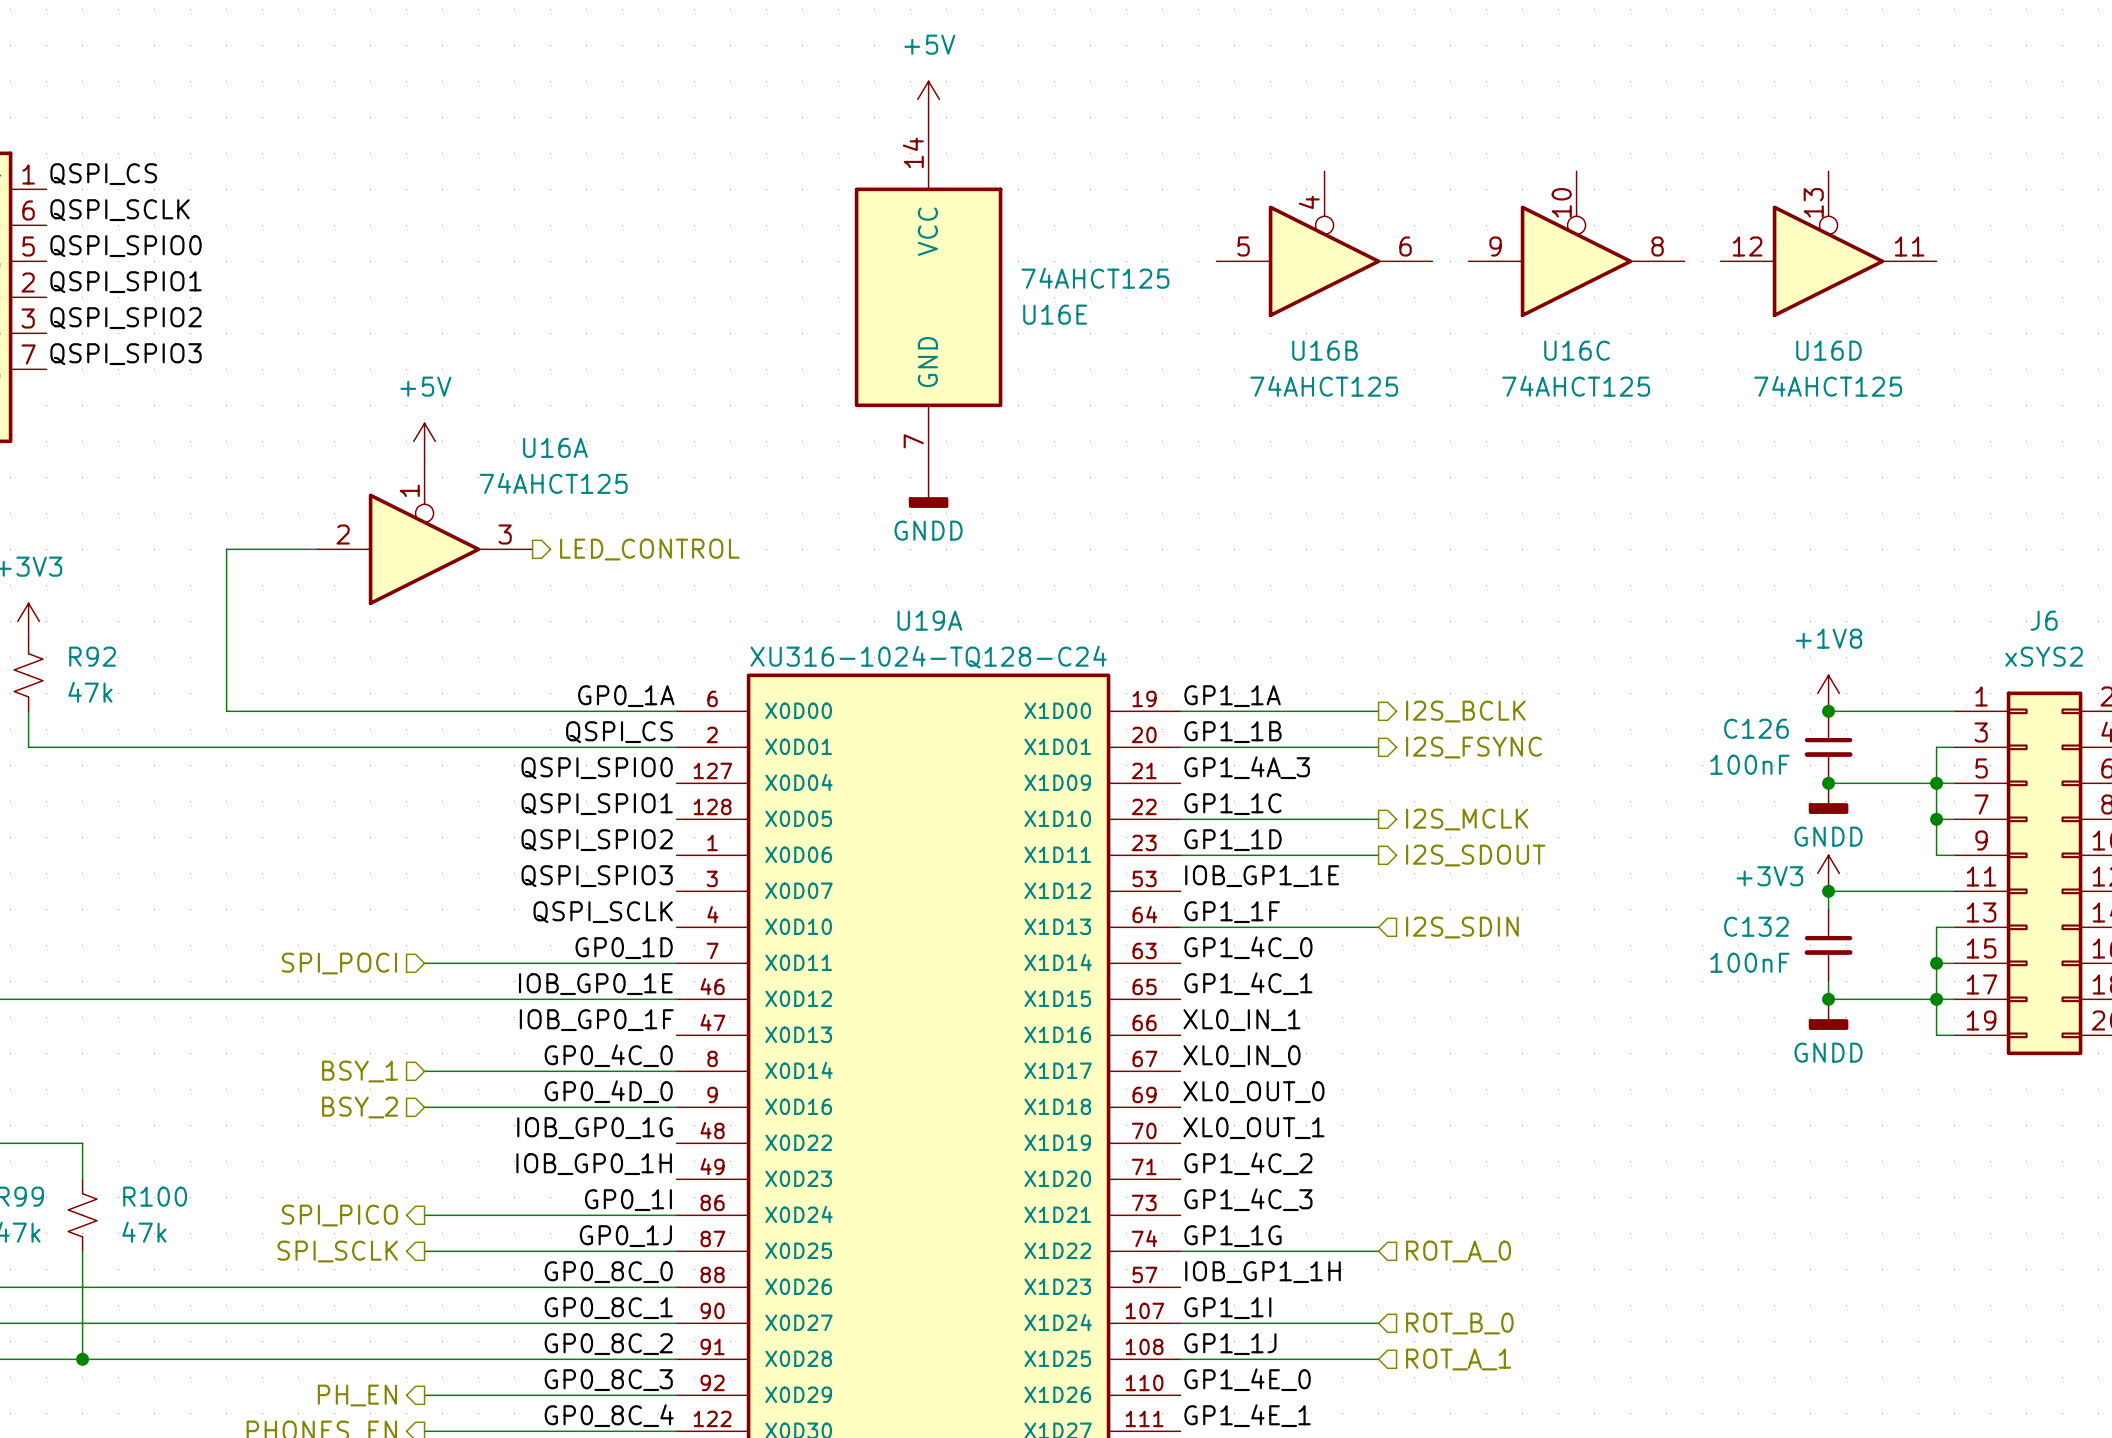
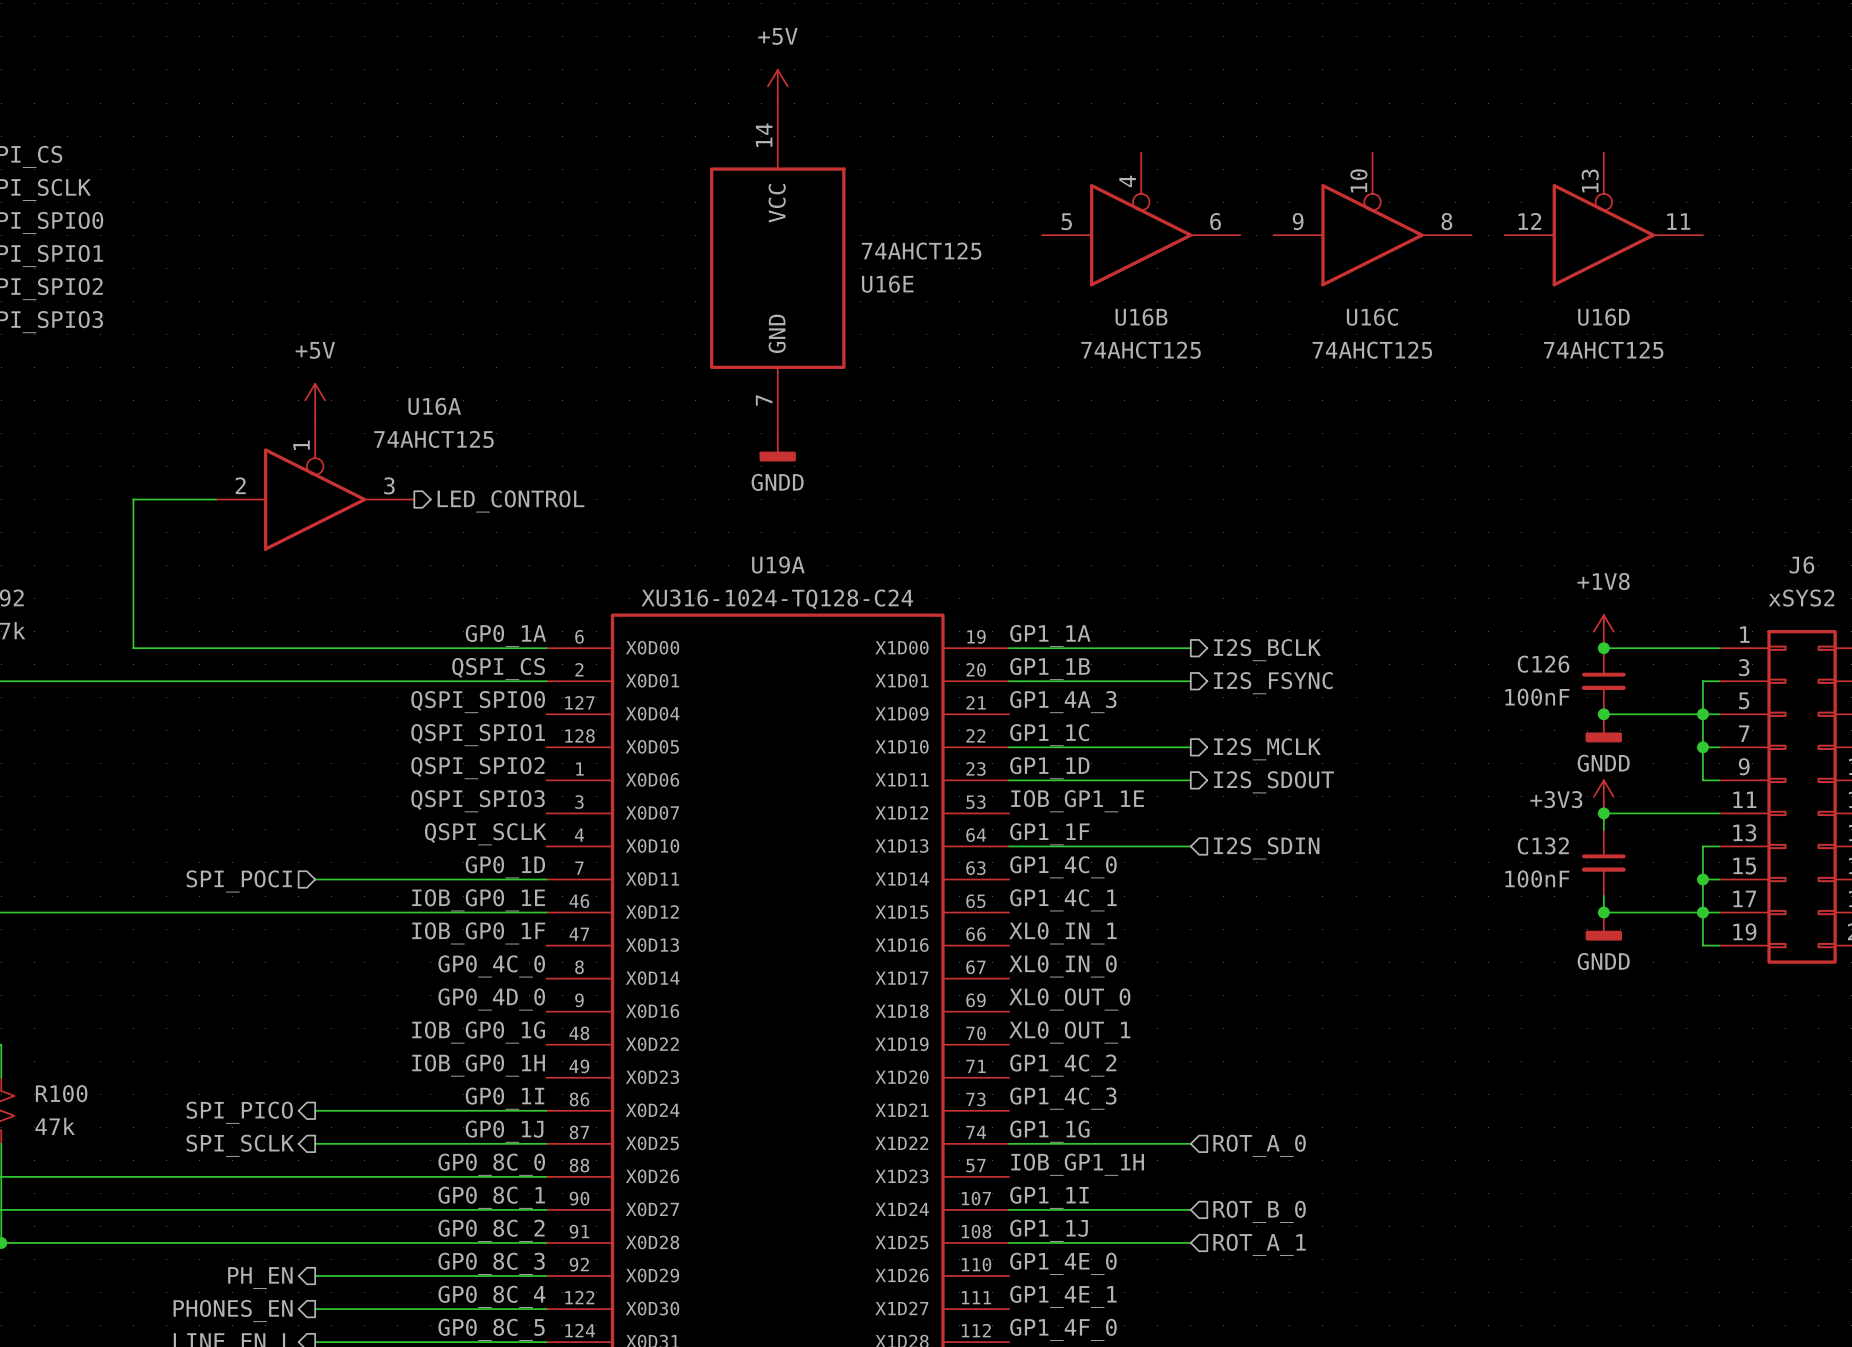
hierarchical label: BSY_1 (360, 1071) -> none
wire: (424, 1071) (676, 1071) -> none
hierarchical label: BSY_2 (360, 1107) -> none
wire: (424, 1107) (676, 1107) -> none

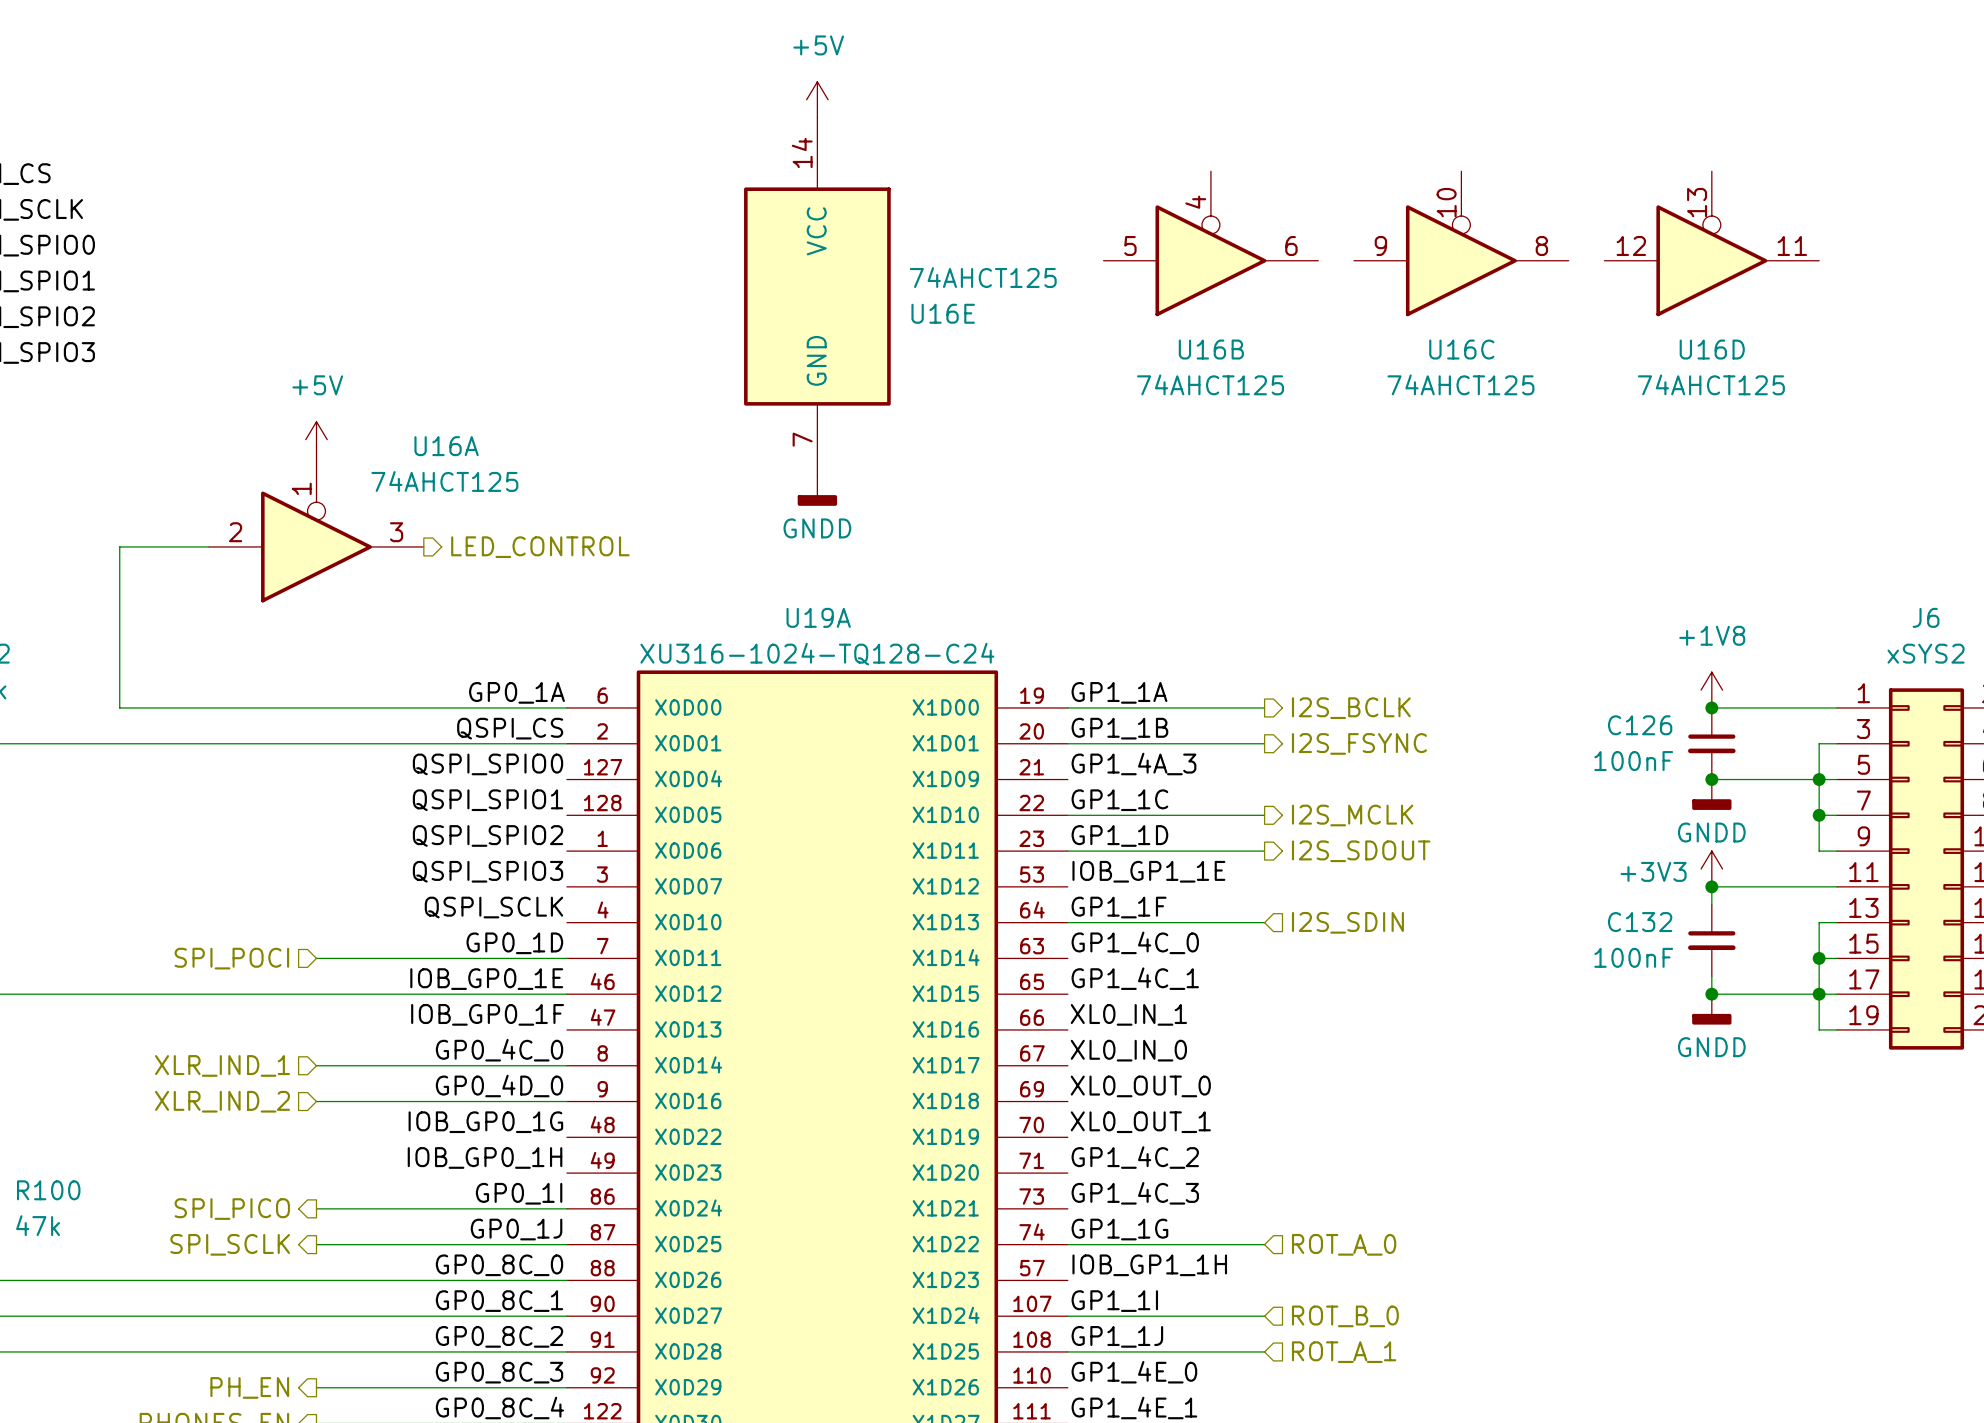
wire: none -> (316, 1065) (566, 1065)
hierarchical label: none -> XLR_IND_1 (222, 1065)
wire: none -> (316, 1101) (566, 1101)
hierarchical label: none -> XLR_IND_2 (222, 1101)

